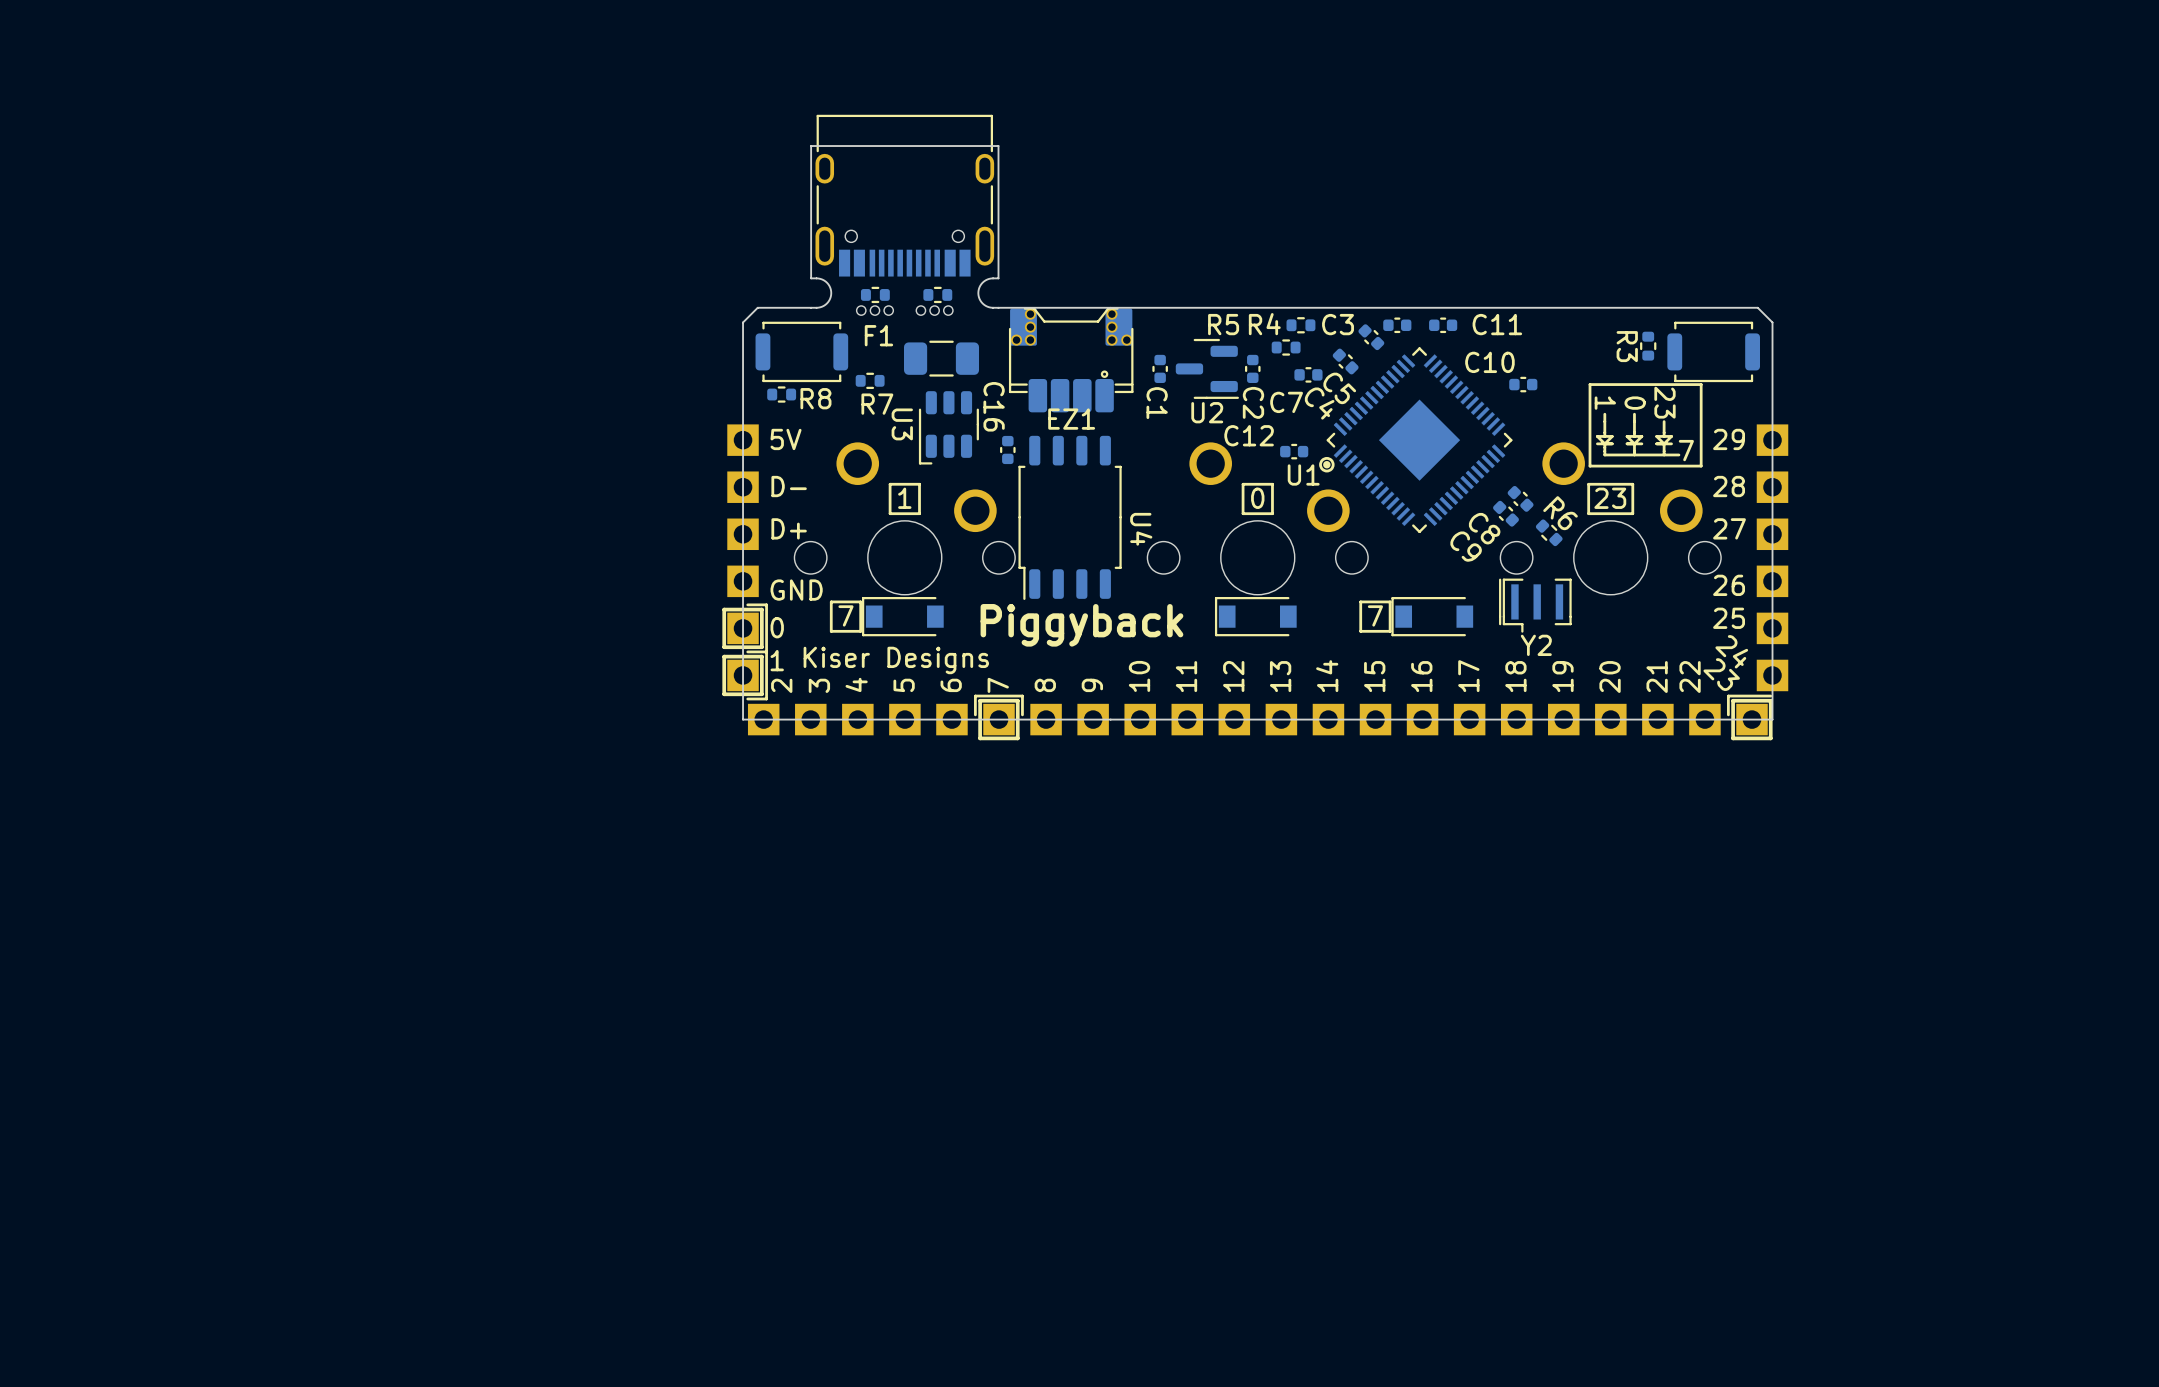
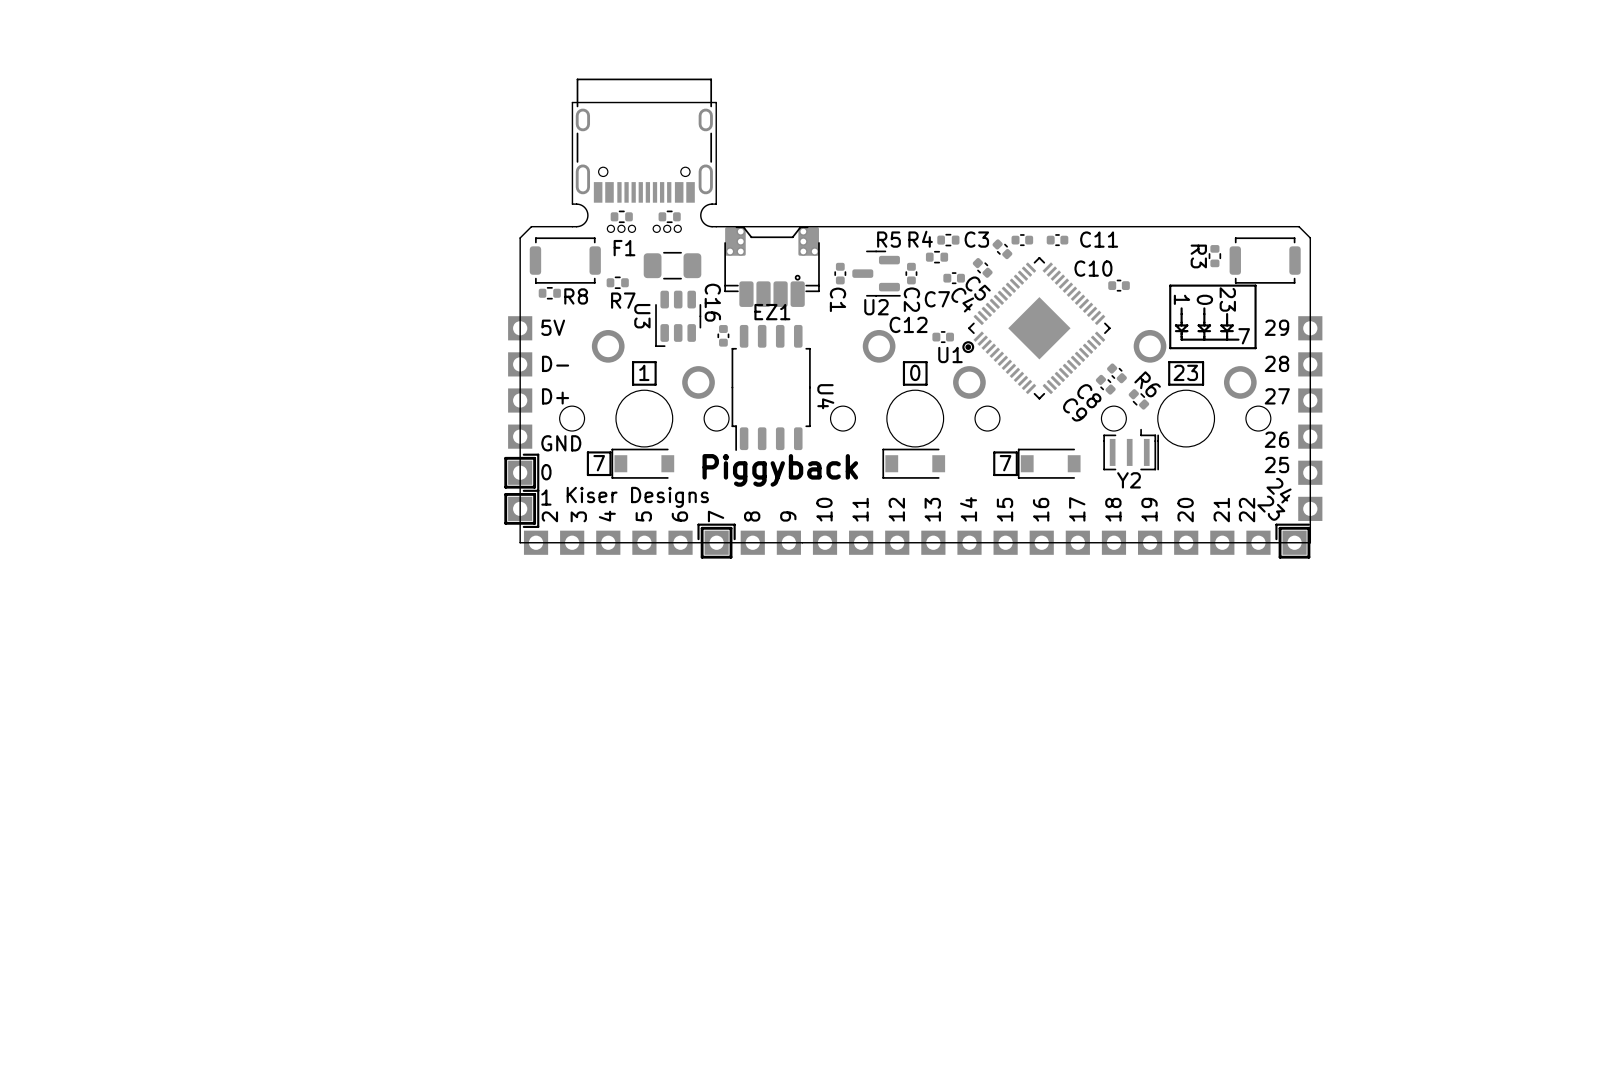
Y2 rotation: 0° (1535, 605) -> 180° (1131, 449)

